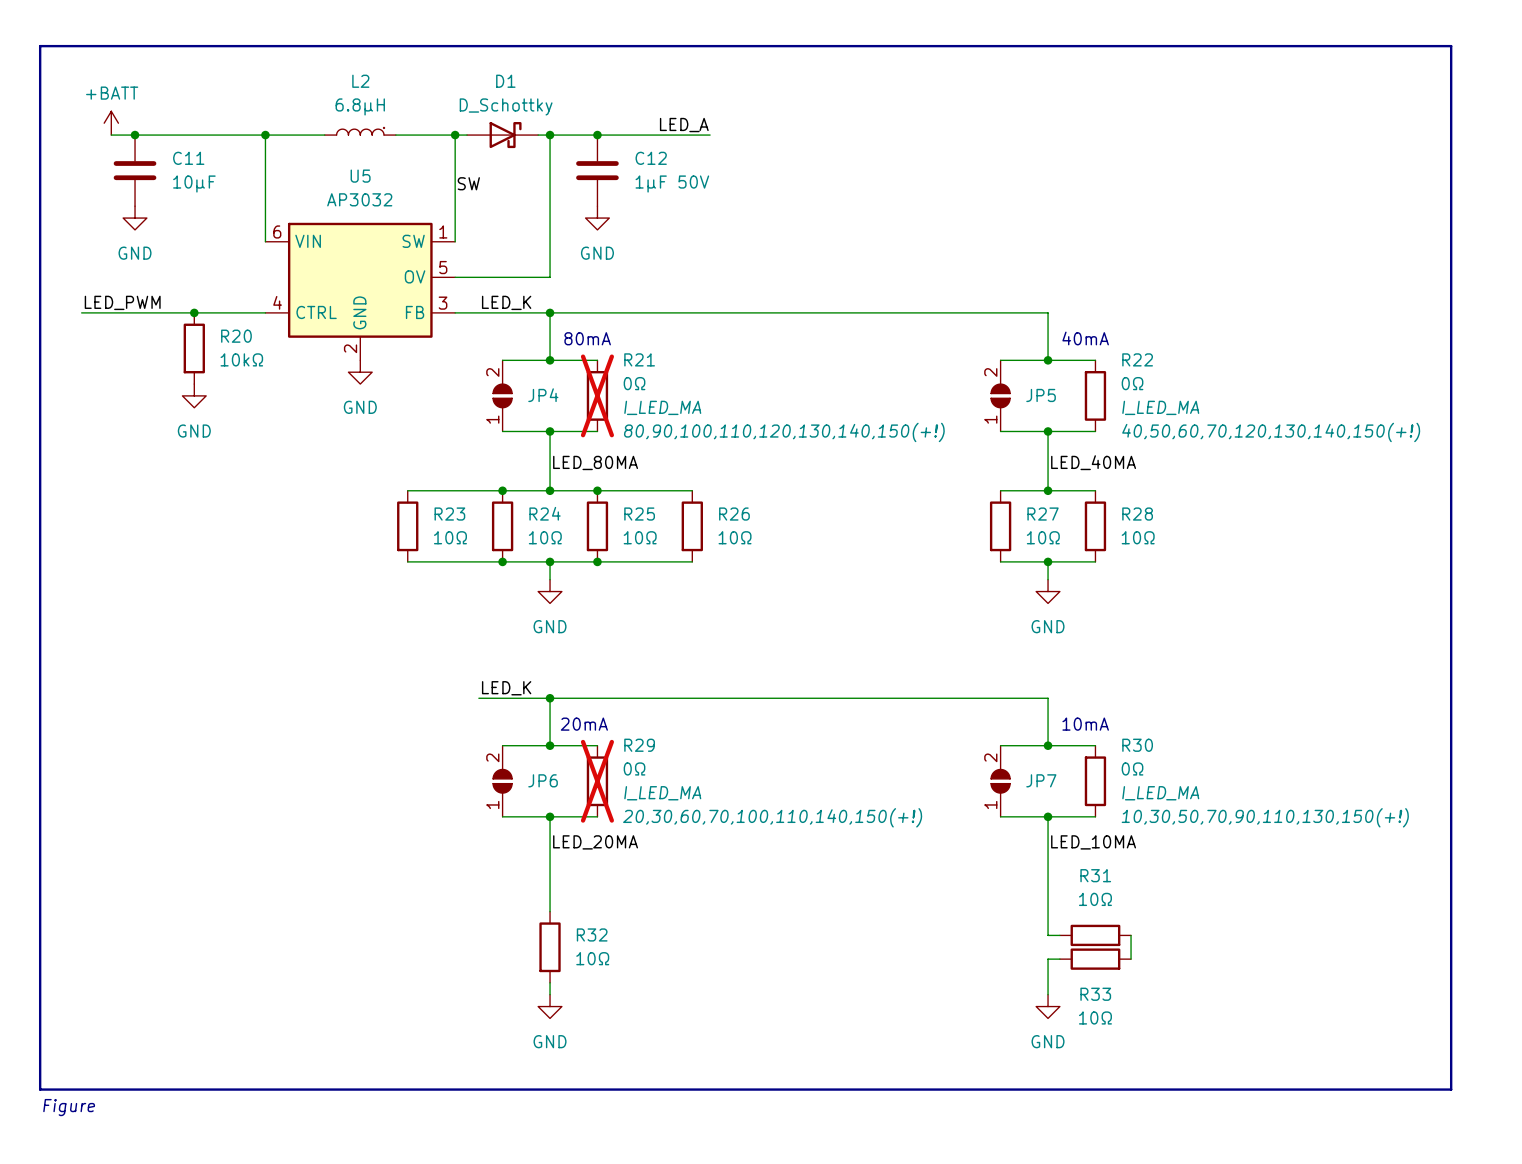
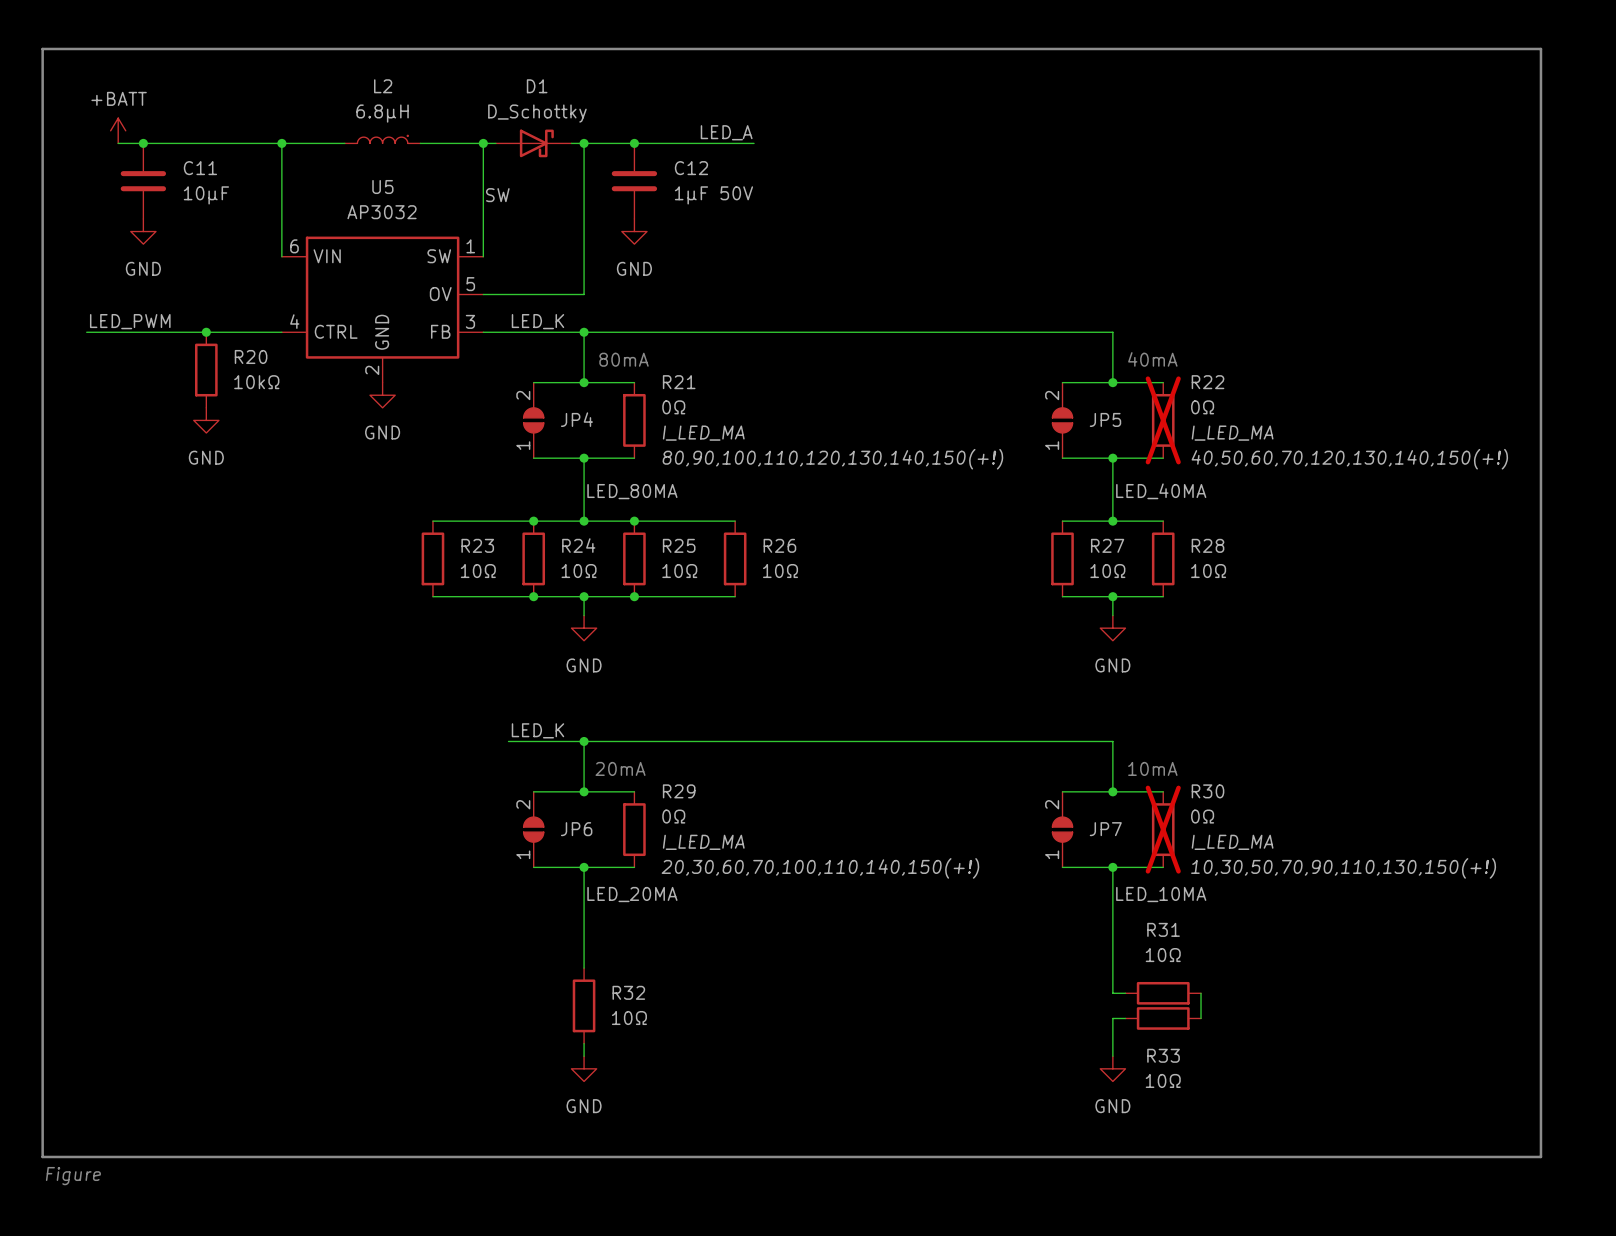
R21 do-not-place cross: (597, 395) -> none
R22 do-not-place cross: none -> (1163, 420)
R29 do-not-place cross: (597, 781) -> none
R30 do-not-place cross: none -> (1163, 829)

